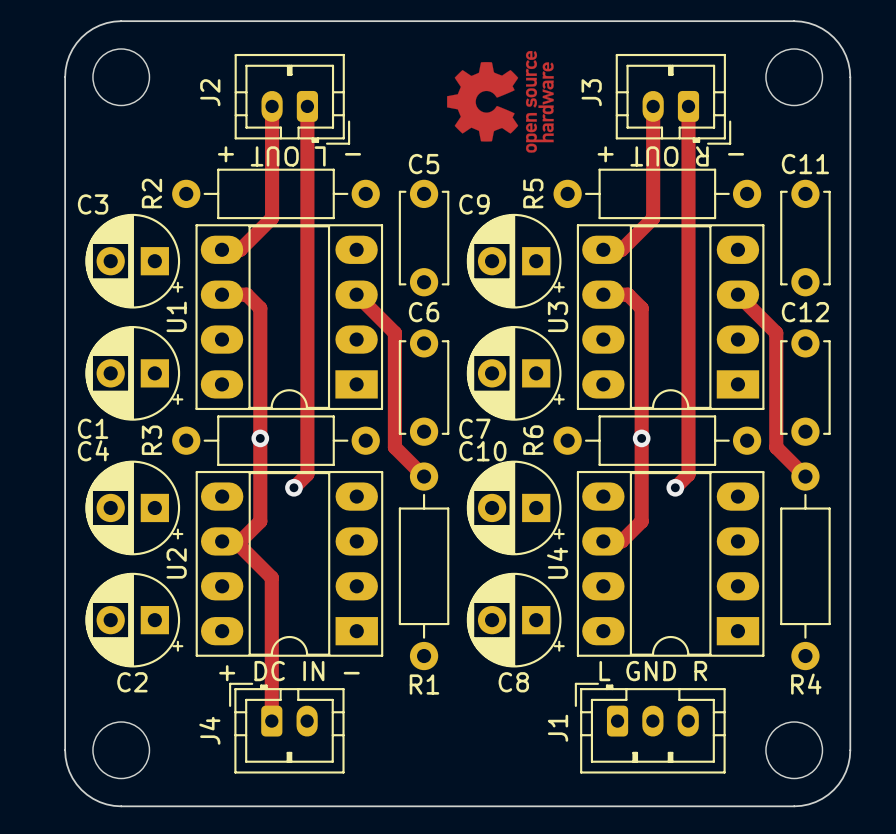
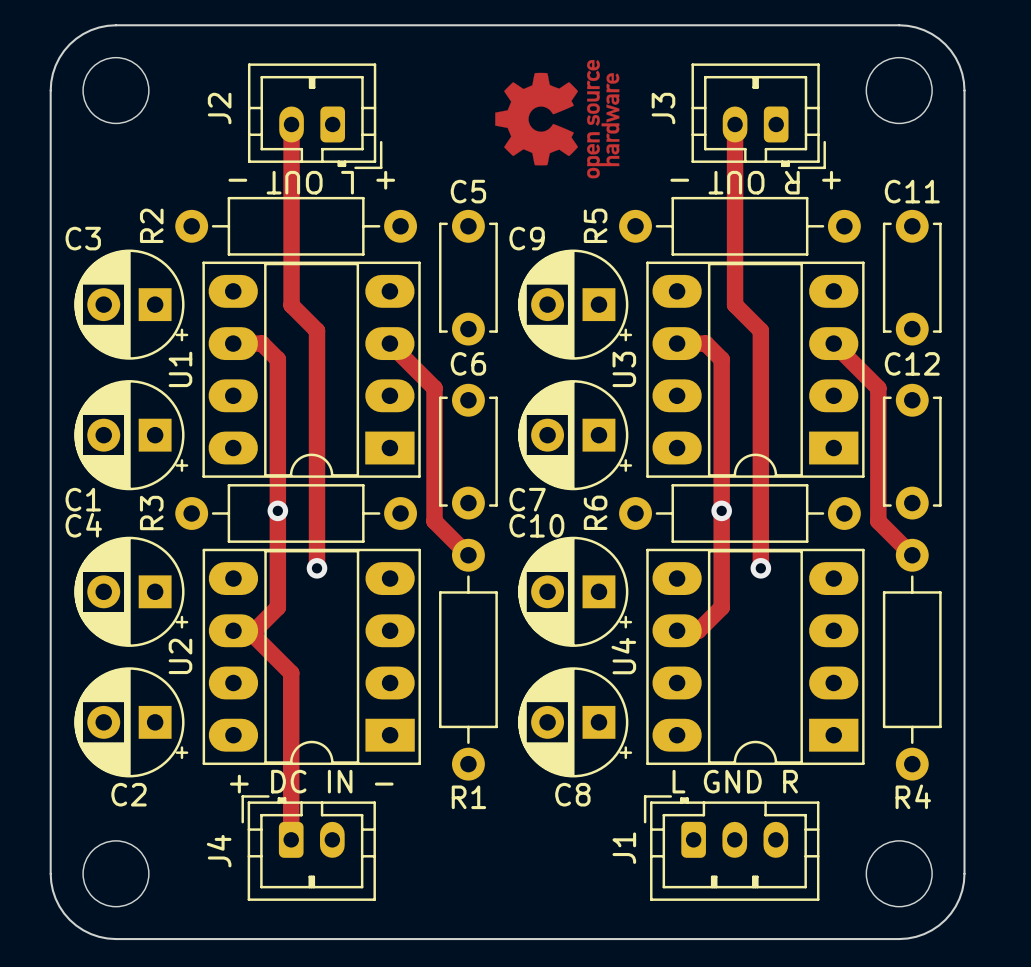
track: (307, 106) (307, 474) (293, 487) -> (291, 254) (291, 305) (317, 330) (317, 568)
track: (688, 106) (688, 474) (675, 487) -> (735, 254) (735, 304) (760, 330) (760, 568)
text: - L OUT + (289, 156) -> + L OUT - (311, 182)
text: - R OUT + (670, 156) -> + R OUT - (755, 182)
track: (272, 218) (240, 249) (222, 249) -> none
track: (653, 218) (621, 249) (603, 249) -> none

